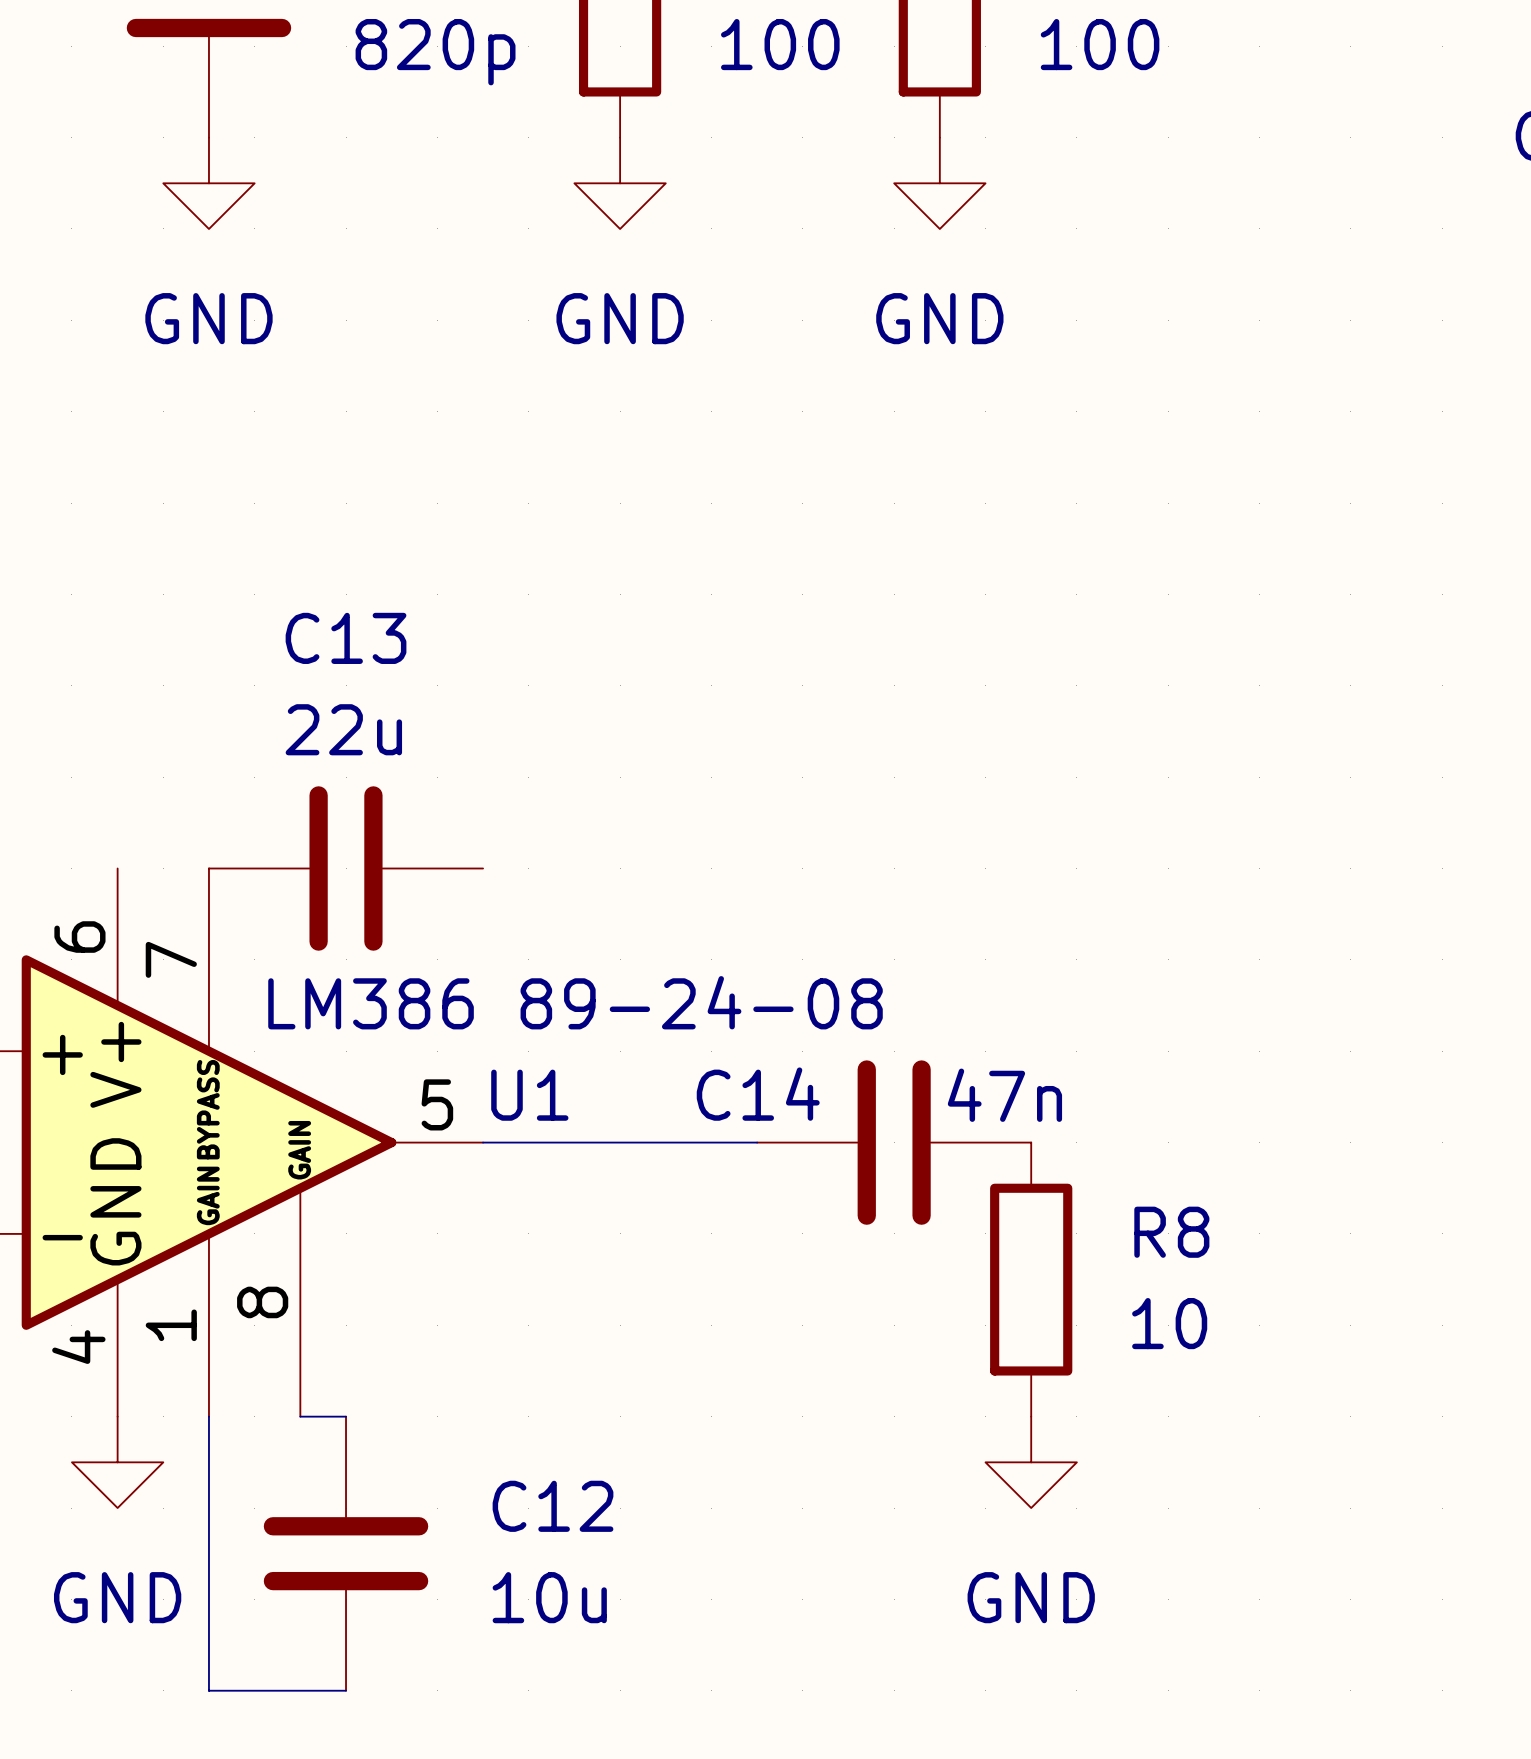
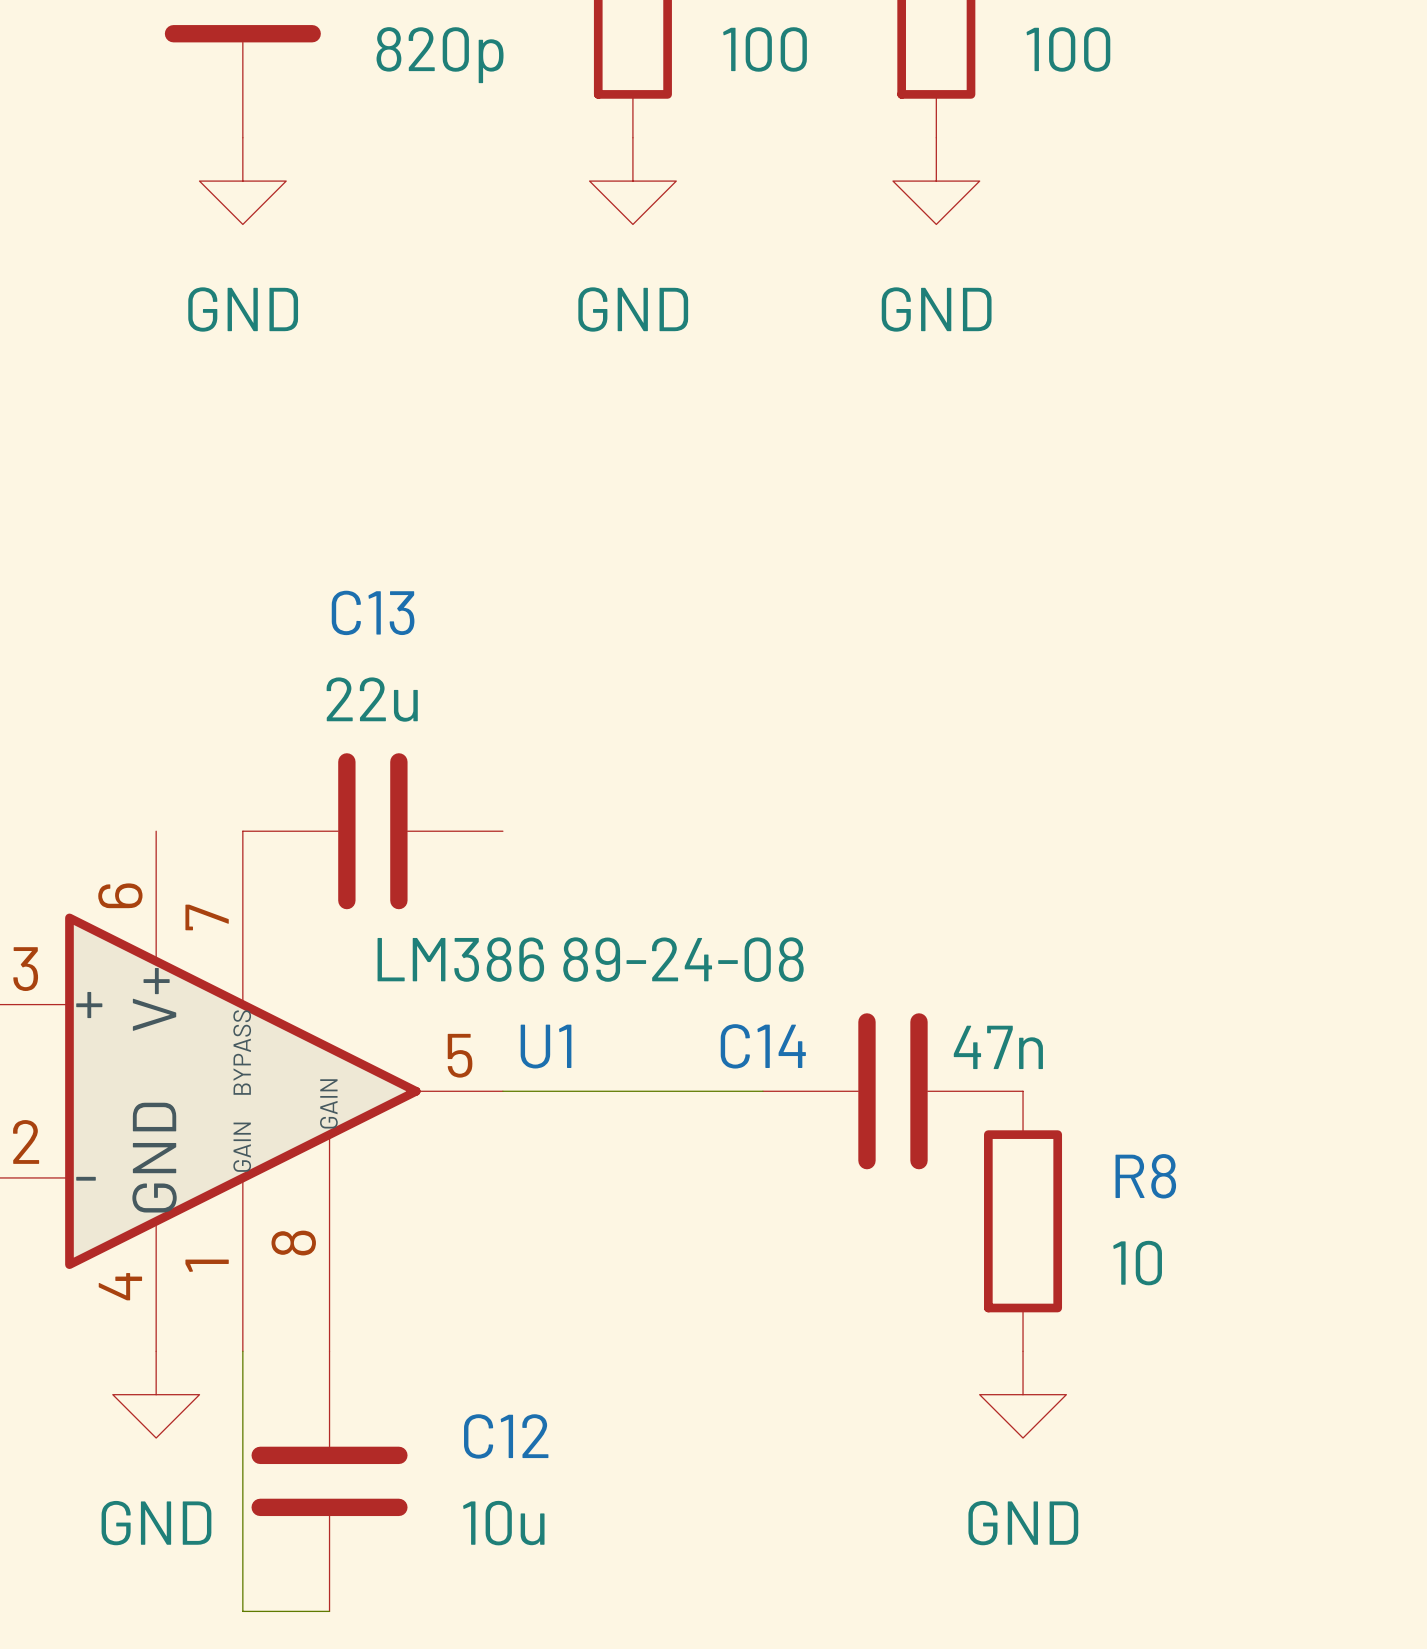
wire: (300, 1416) (346, 1416) -> none
C12 position: (346, 1553) -> (329, 1481)
wire: (300, 1690) (346, 1690) -> none

